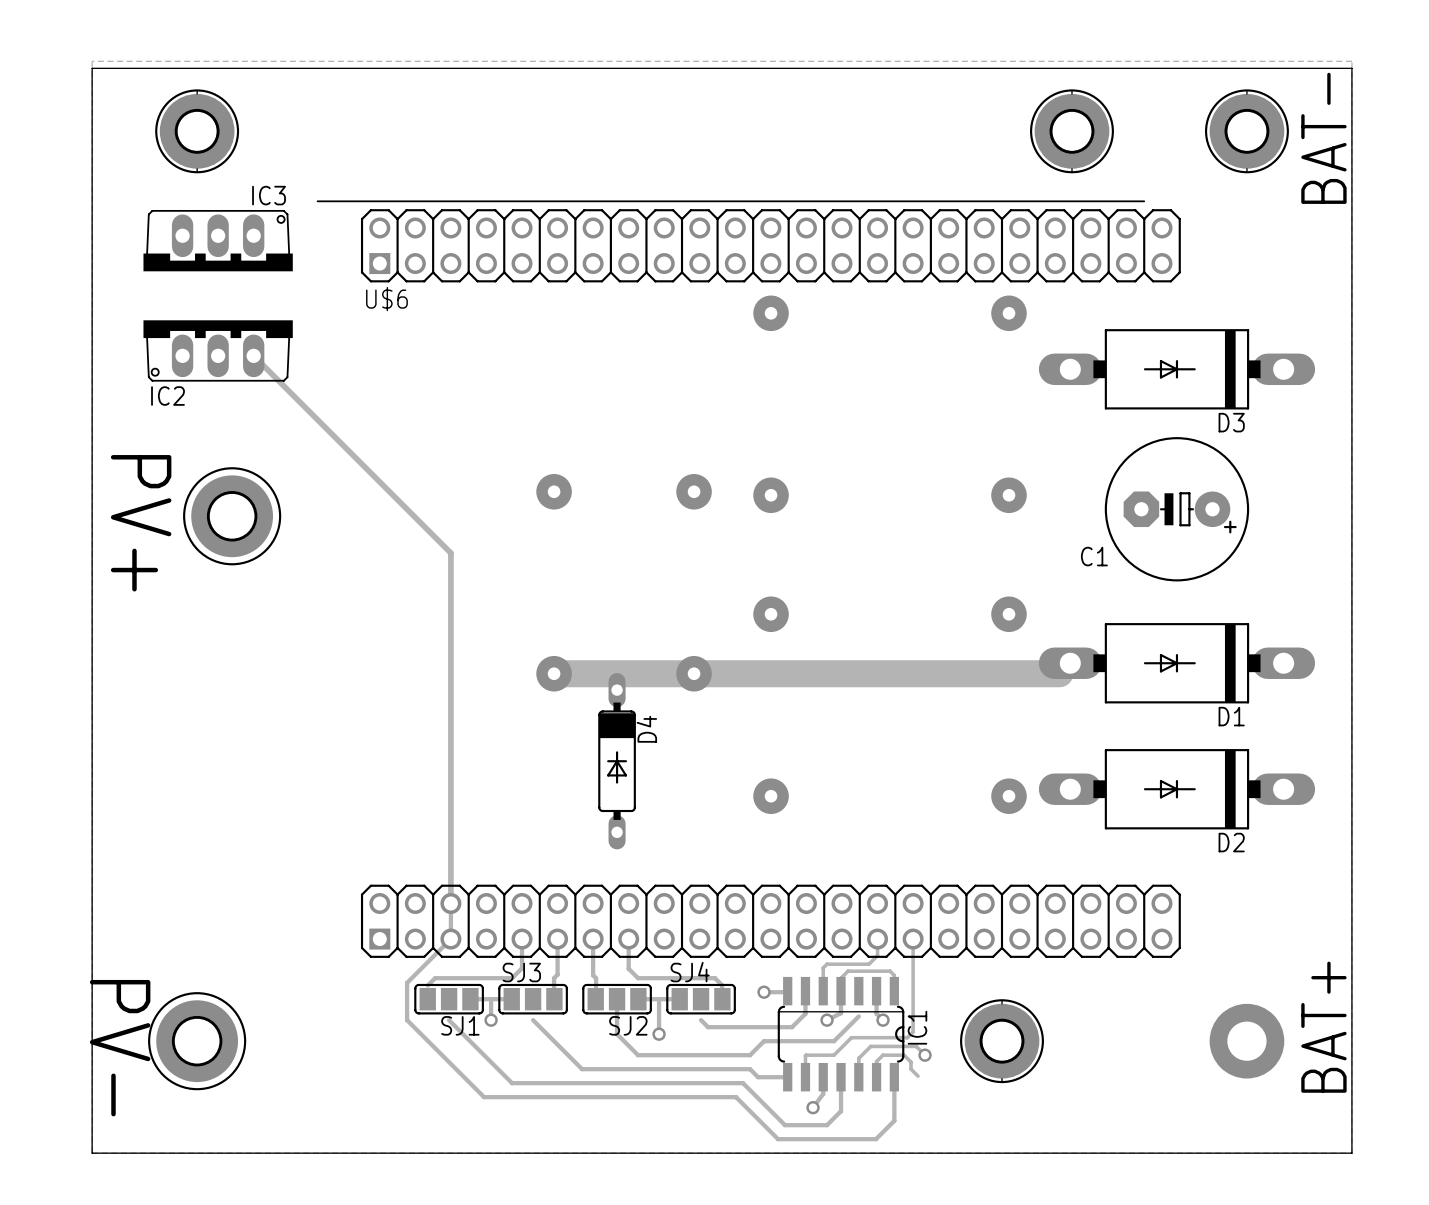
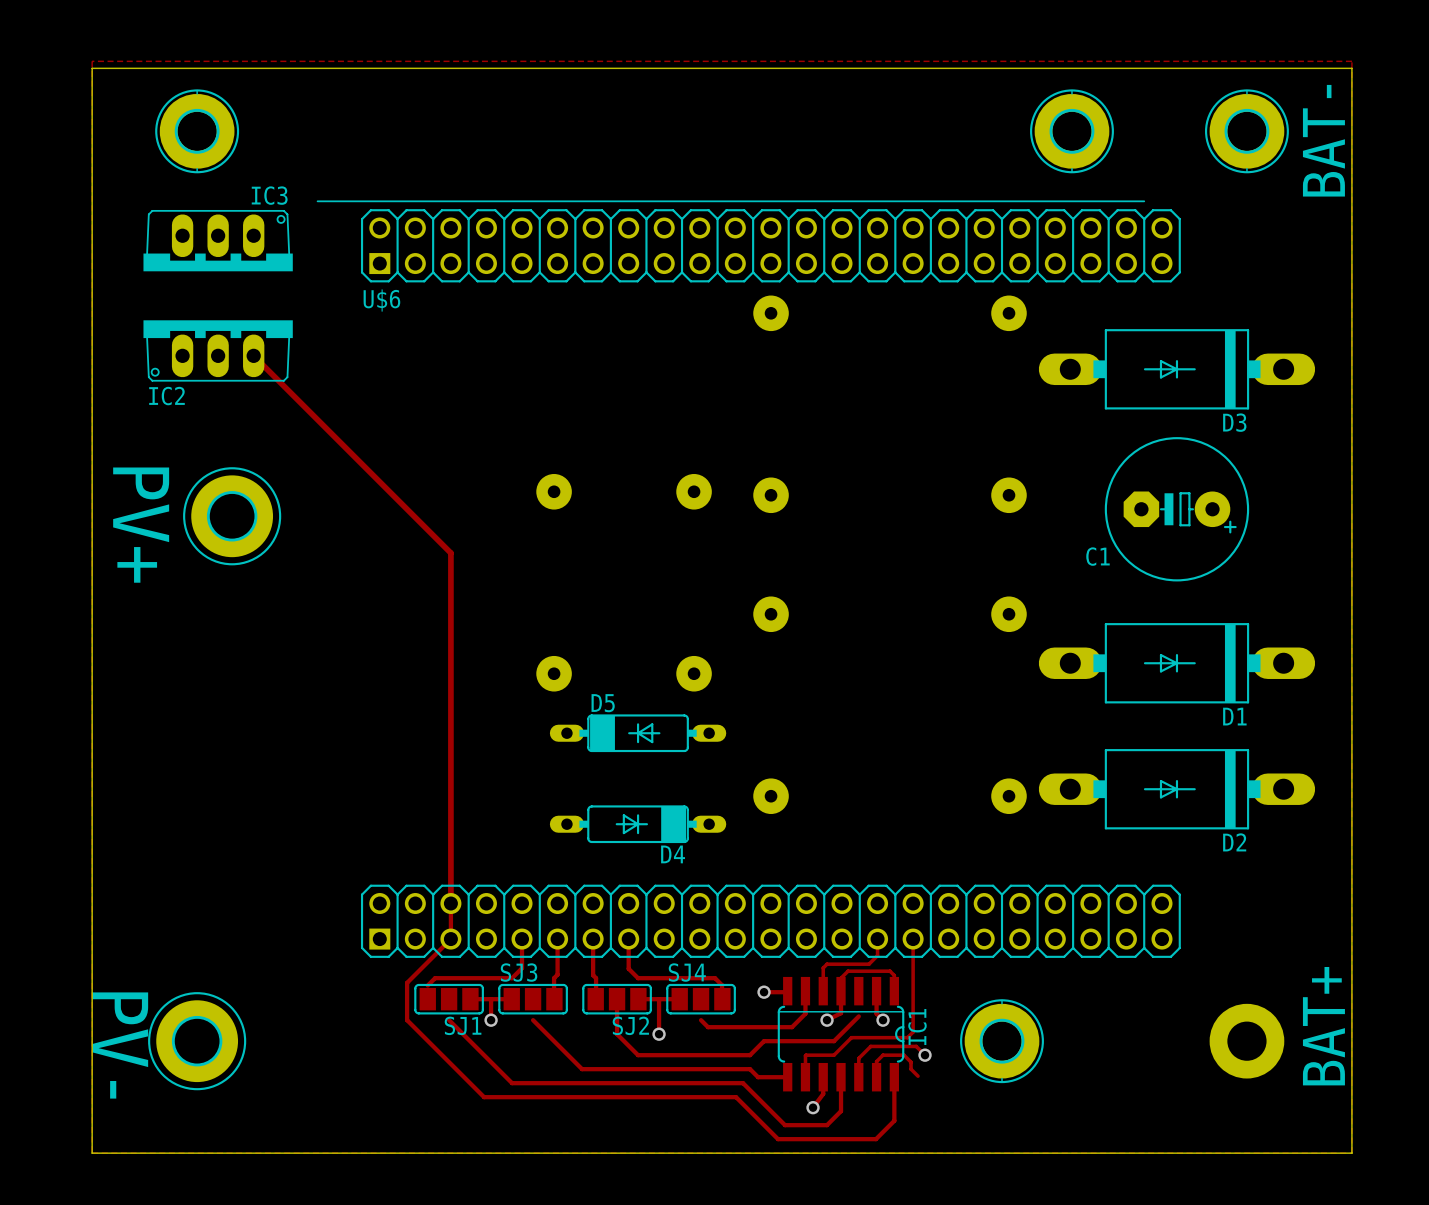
track: (554, 673) (1059, 673) -> none
D5: none -> (638, 733)
D4 rotation: 0° (617, 761) -> 90° clockwise (638, 824)

